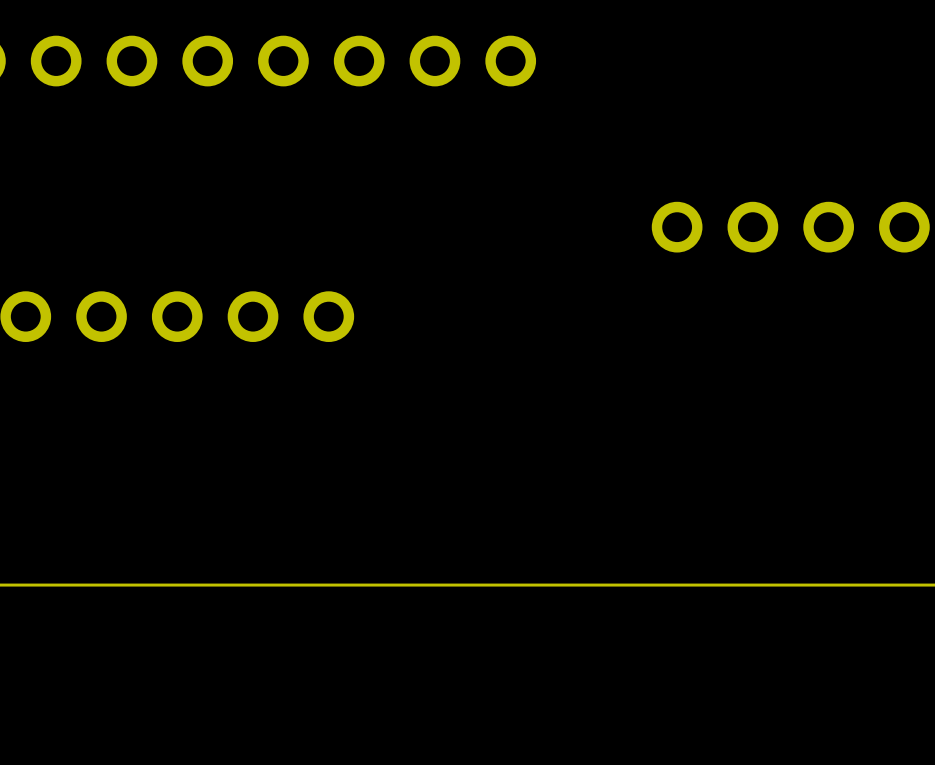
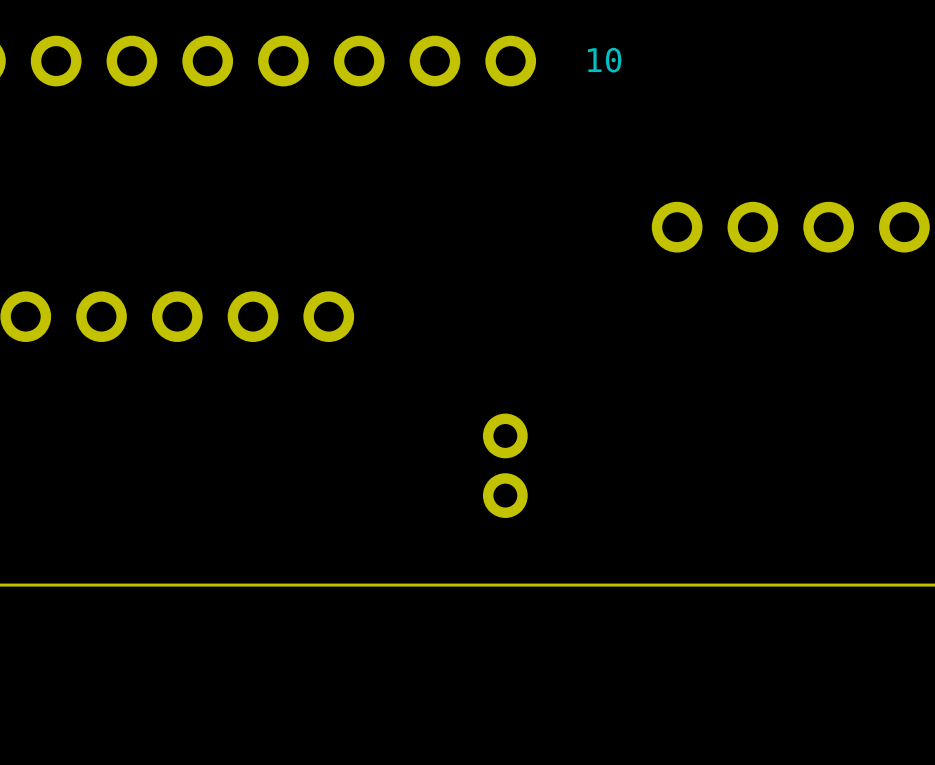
text: none -> 10 (604, 60)
part: none -> (505, 465)

